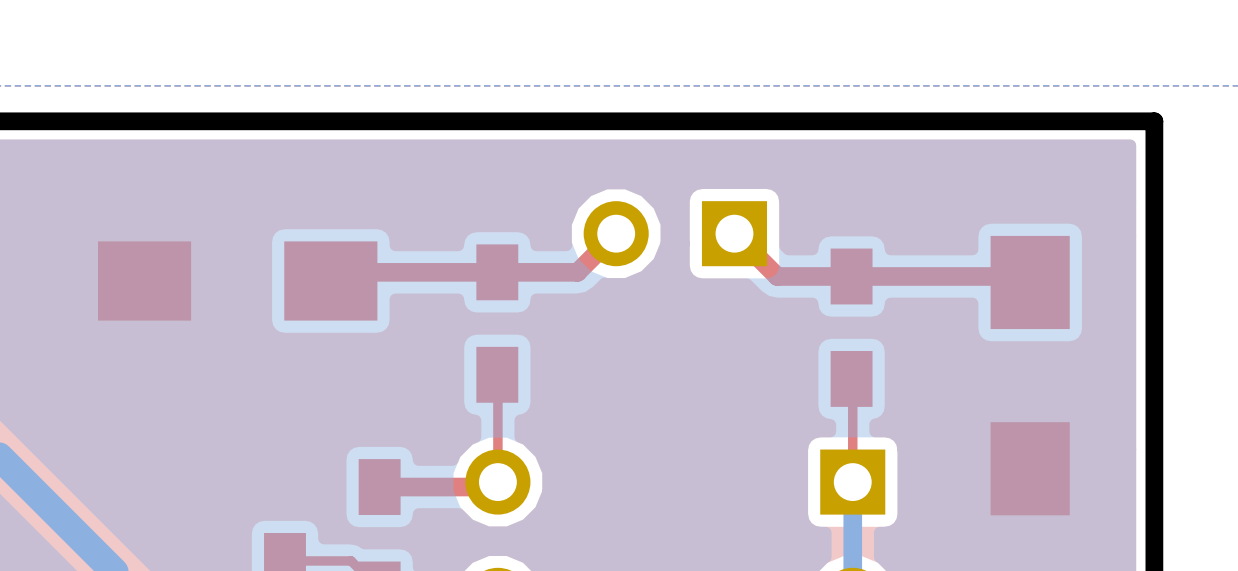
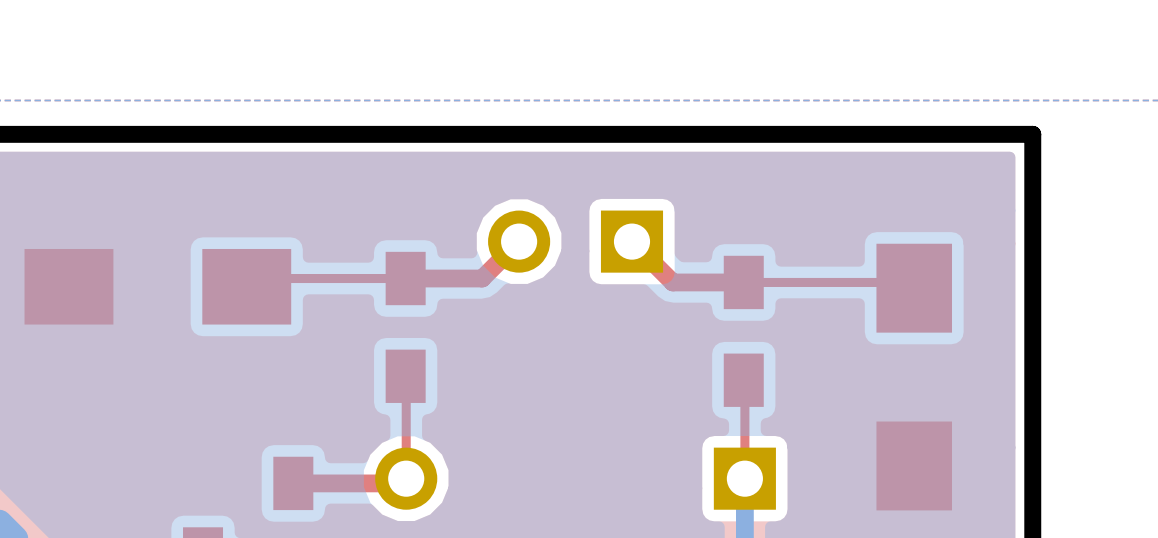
top track width: thick (497, 272) (339, 272) -> thin (405, 278) (255, 278)
top track width: thick (1024, 276) (851, 276) -> thin (908, 282) (743, 282)

